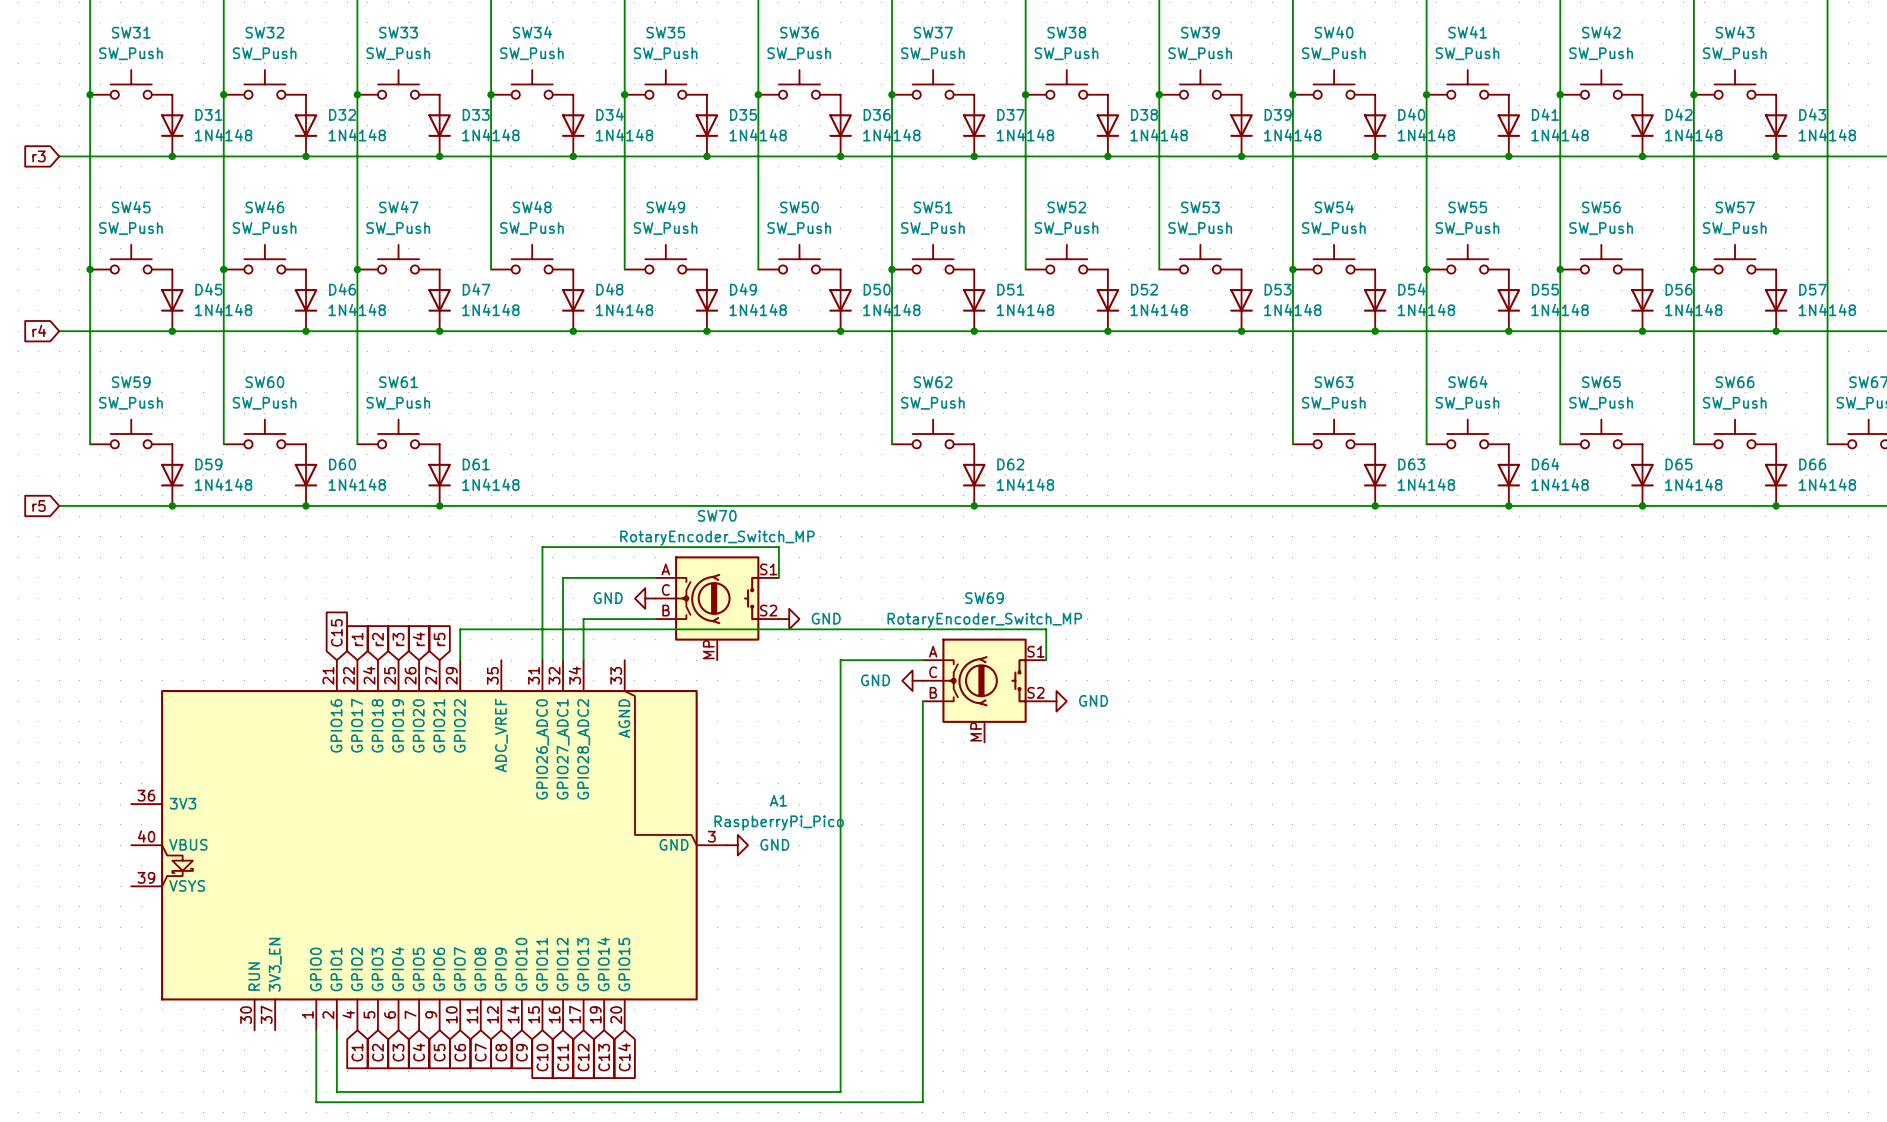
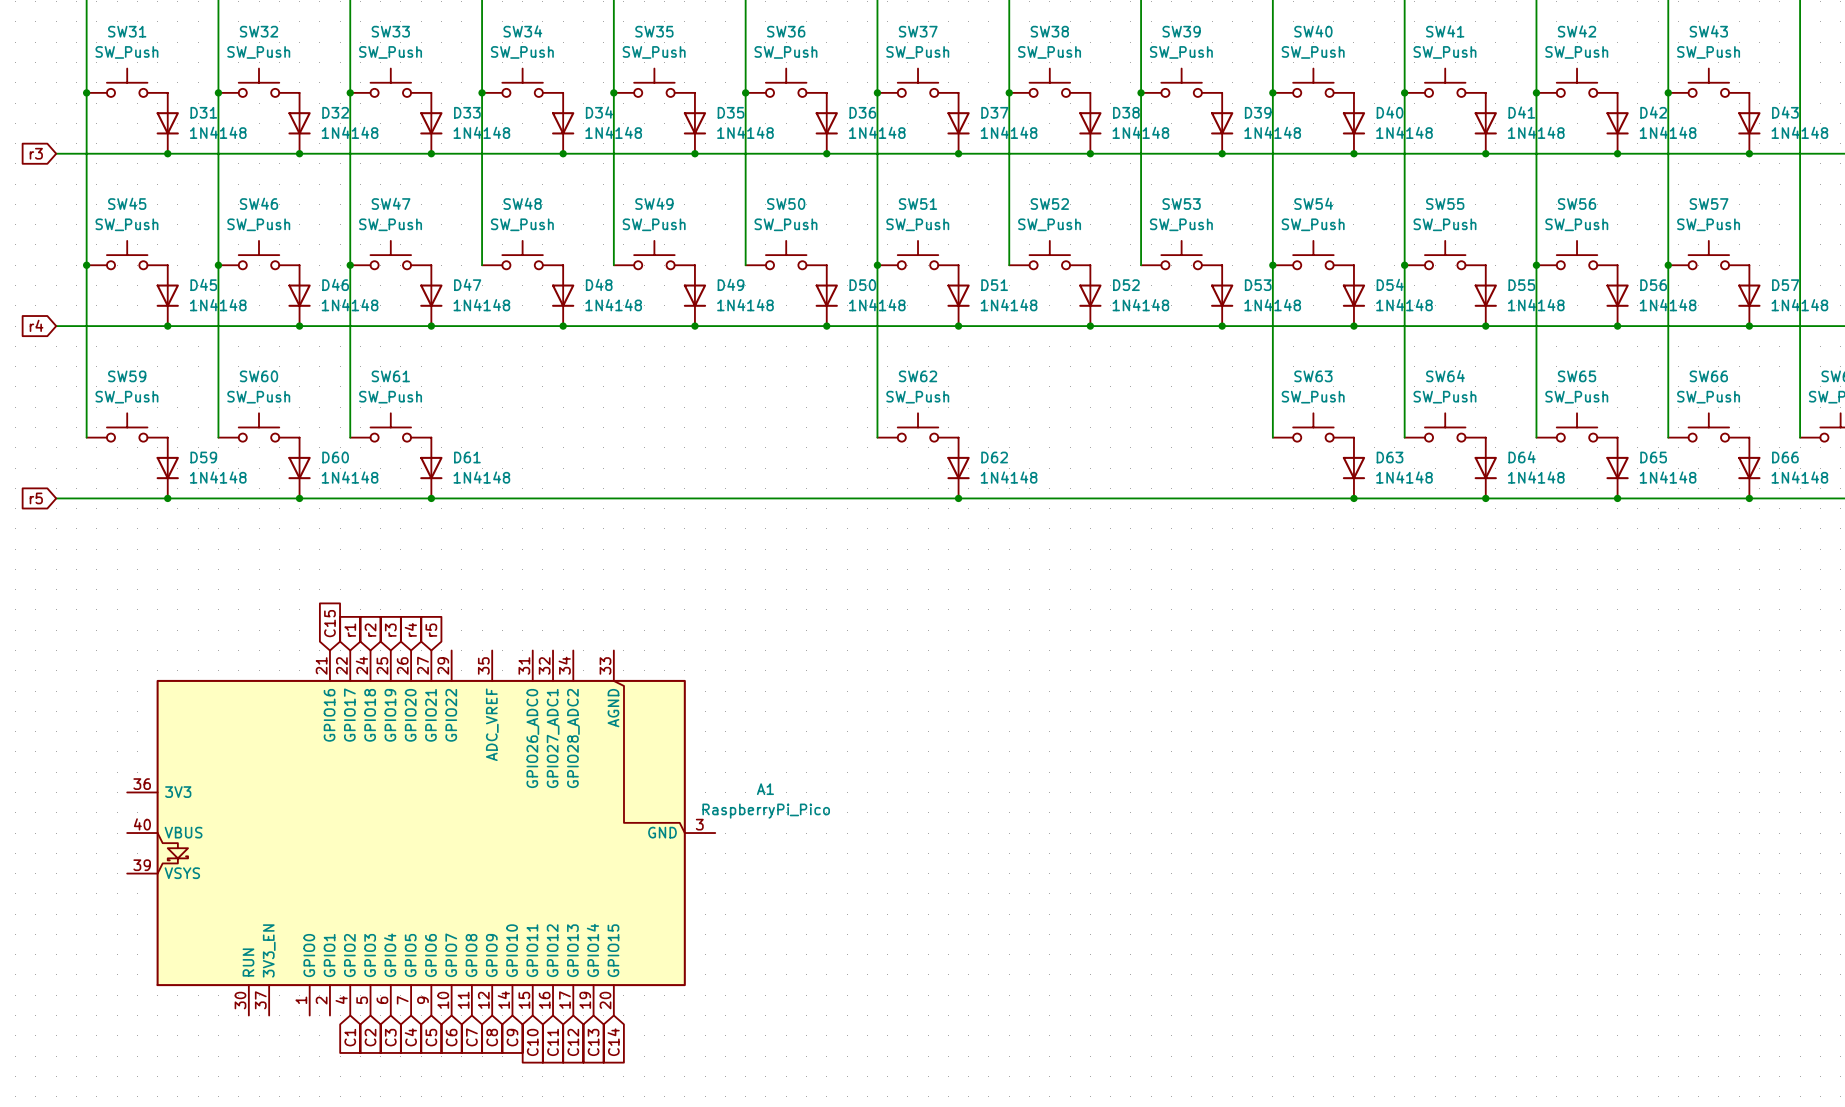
wire: (655, 577) (563, 577) (563, 660) -> none
wire: (778, 577) (778, 547) (542, 547) (542, 660) -> none
power symbol: GND (645, 598) -> none
SW70: RotaryEncoder_Switch_MP (717, 608) -> none
wire: (655, 619) (583, 619) (583, 660) -> none
power symbol: GND (789, 619) -> none
wire: (460, 660) (460, 629) (1046, 629) (1046, 660) -> none
wire: (922, 660) (840, 660) (840, 1091) (336, 1091) (336, 1030) -> none
power symbol: GND (912, 680) -> none
SW69: RotaryEncoder_Switch_MP (984, 690) -> none
wire: (922, 701) (922, 1102) (316, 1102) (316, 1030) -> none
power symbol: GND (1056, 701) -> none
power symbol: GND (737, 845) -> none

